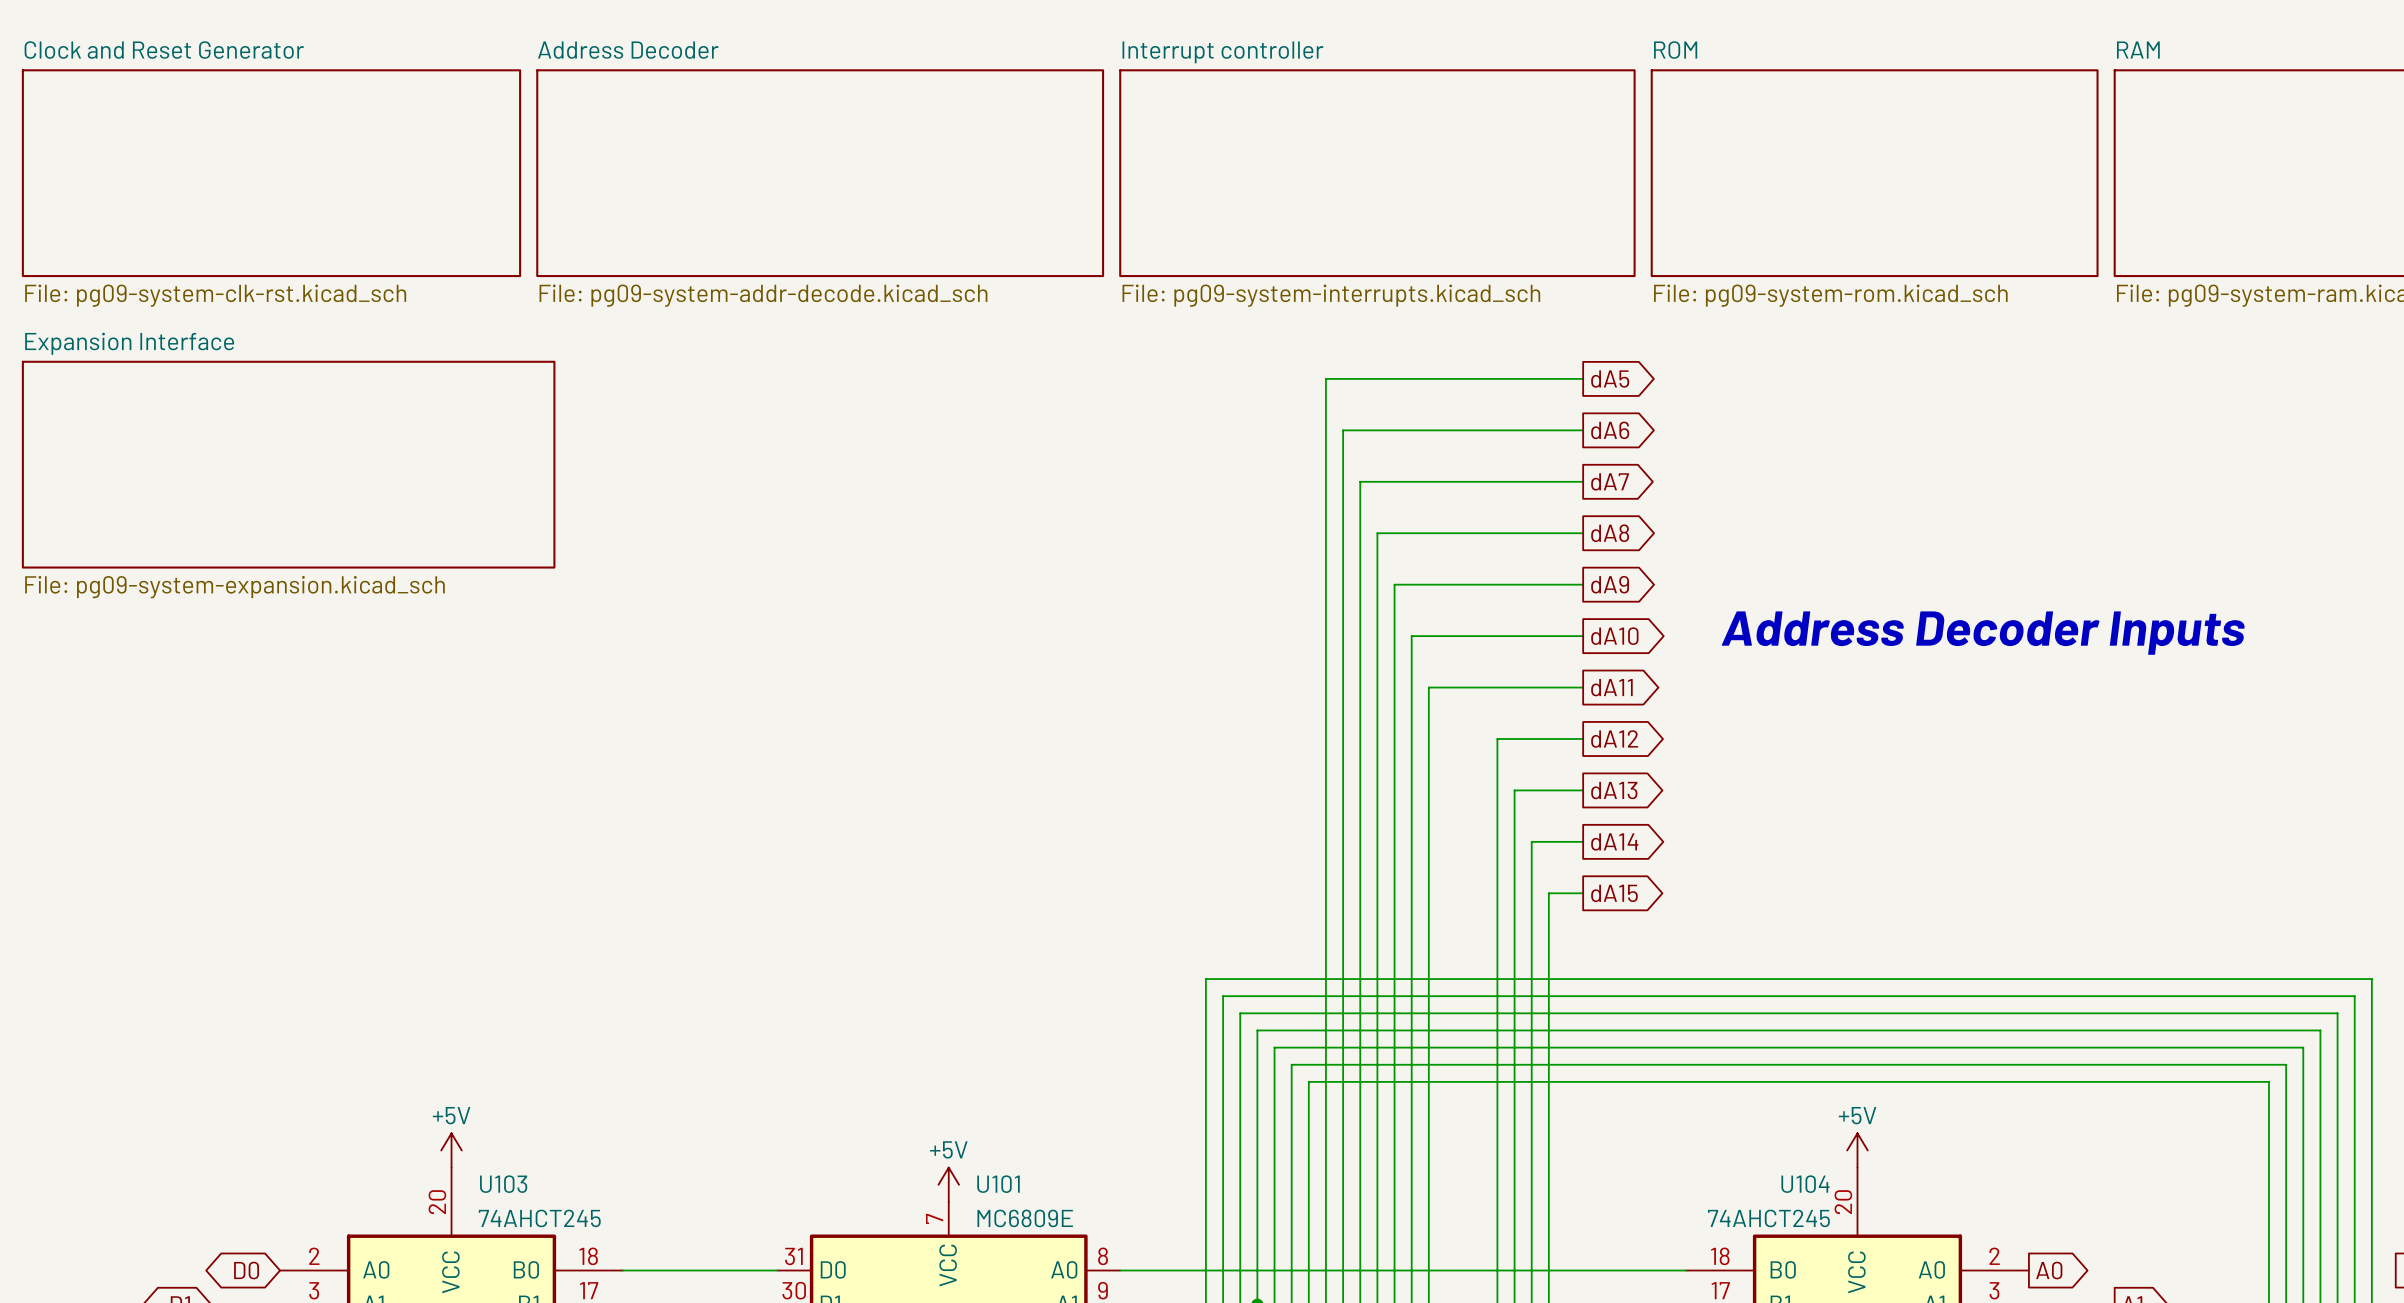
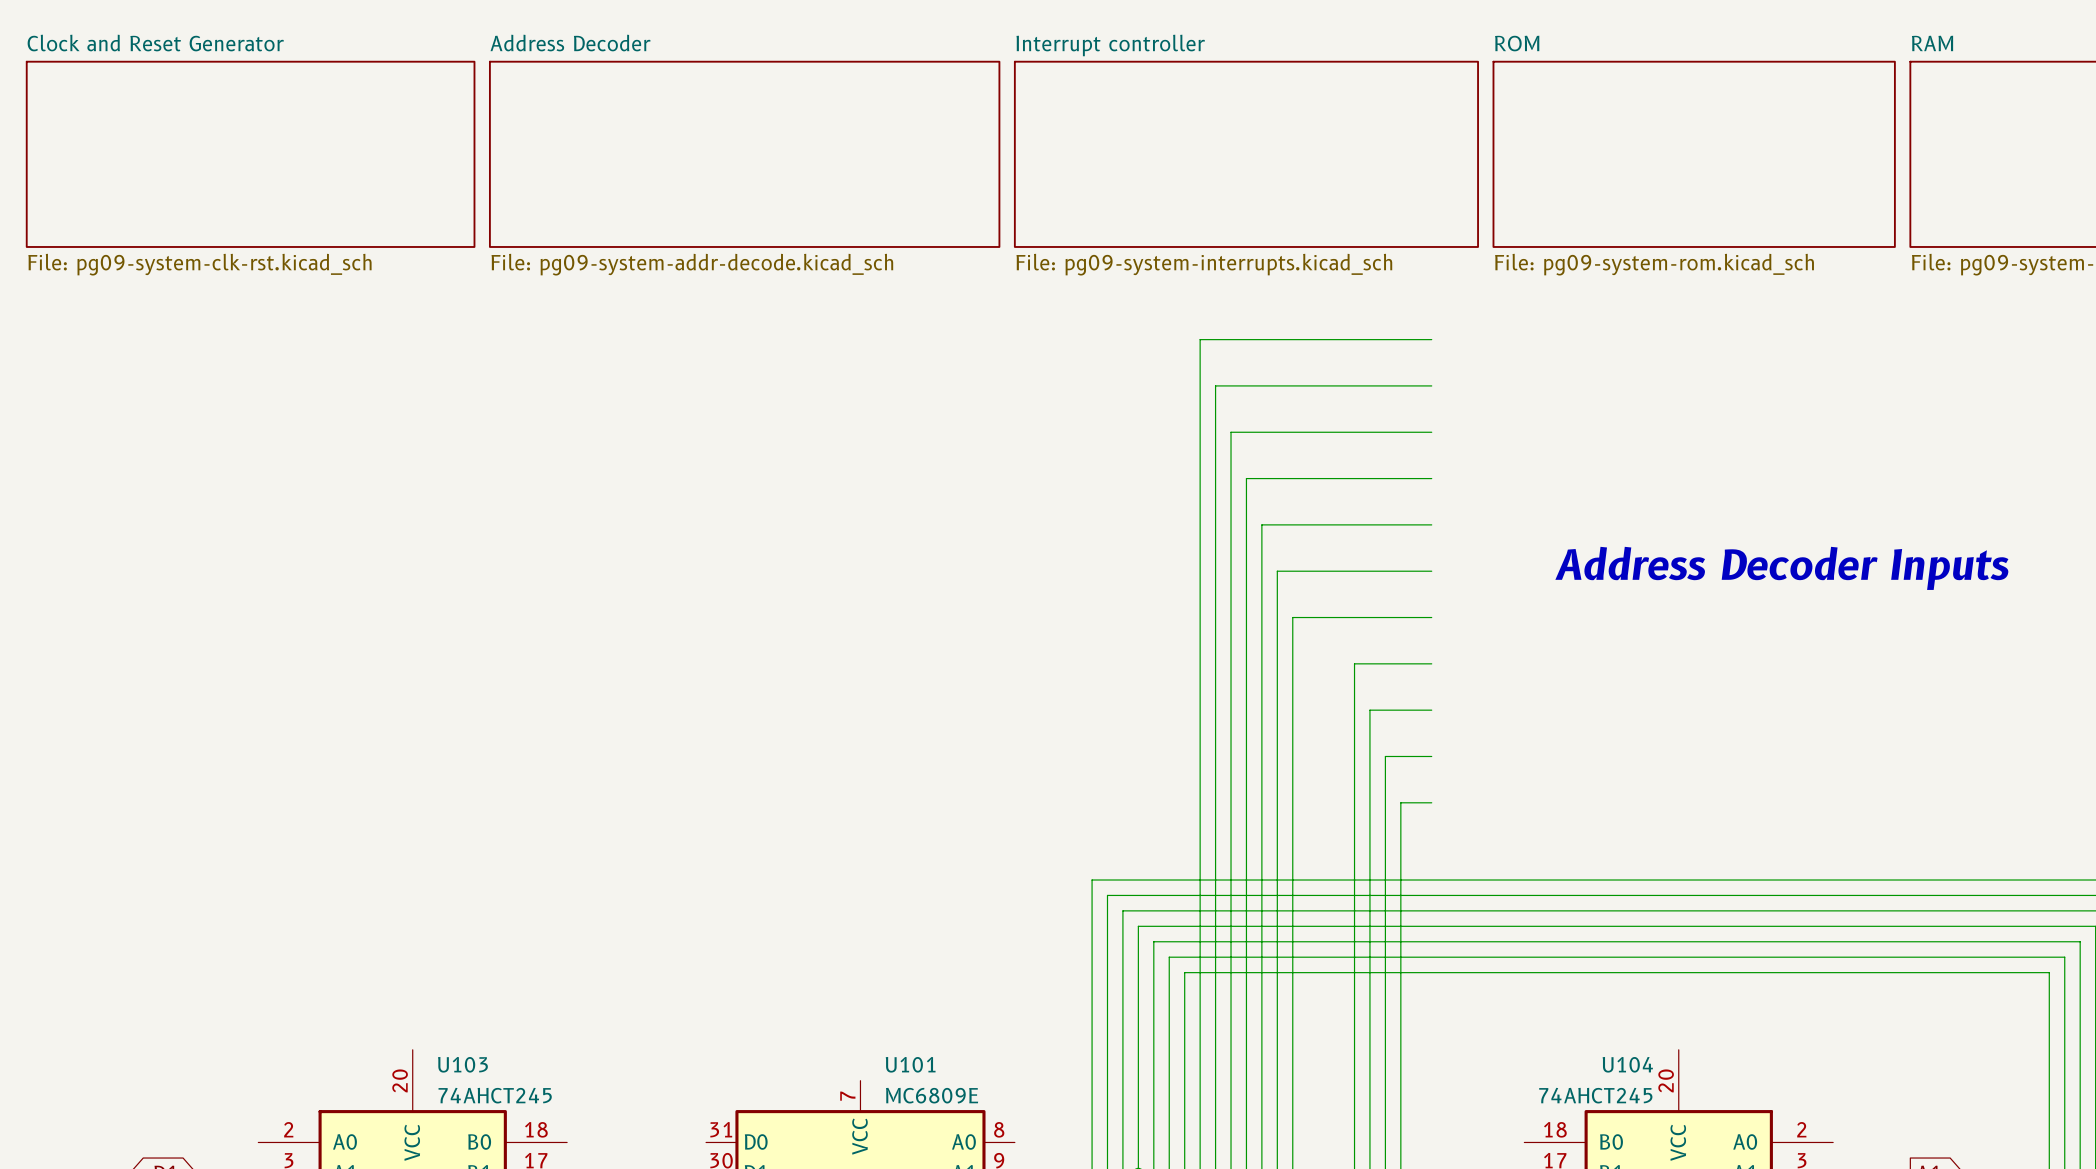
global label: dA5 (1610, 379) -> none
global label: dA6 (1610, 430) -> none
sheet Expansion Interface: File: pg09-system-expansion.kicad_sch (288, 464) -> none
global label: dA7 (1610, 481) -> none
global label: dA8 (1610, 533) -> none
global label: dA9 (1610, 584) -> none
global label: dA10 (1614, 636) -> none
global label: dA11 (1611, 687) -> none
global label: dA12 (1614, 738) -> none
global label: dA13 (1614, 790) -> none
global label: dA14 (1614, 841) -> none
global label: dA15 (1614, 893) -> none
power symbol: +5V (451, 1150) -> none
power symbol: +5V (1857, 1150) -> none
power symbol: +5V (948, 1184) -> none
global label: D0 (246, 1270) -> none
wire: (622, 1270) (777, 1270) -> none
wire: (1120, 1270) (1686, 1270) -> none
global label: A0 (2049, 1270) -> none

